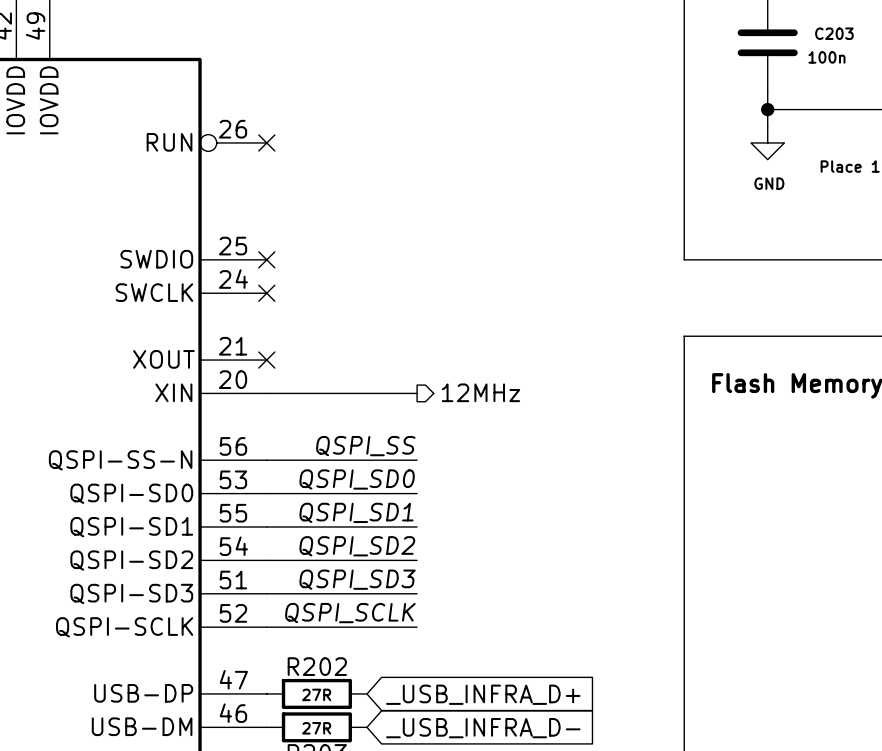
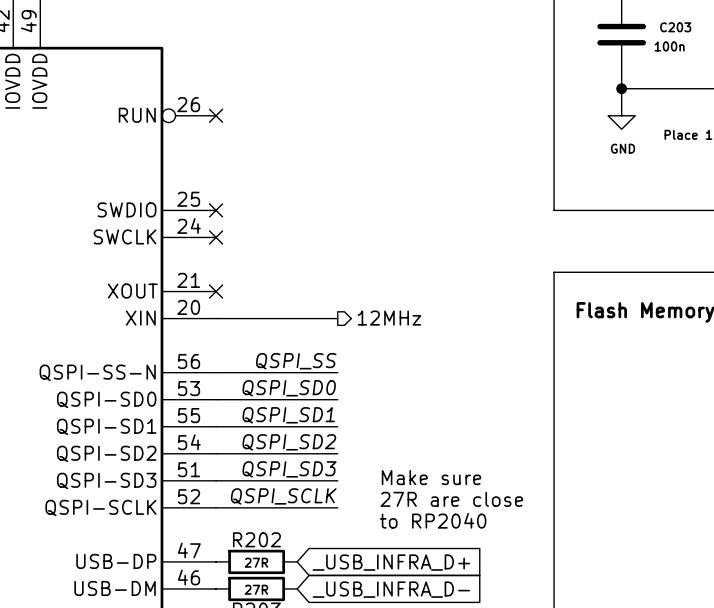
text: none -> Make sure (431, 477)
text: none -> 27R are close (451, 499)
text: none -> to RP2040 (433, 520)

